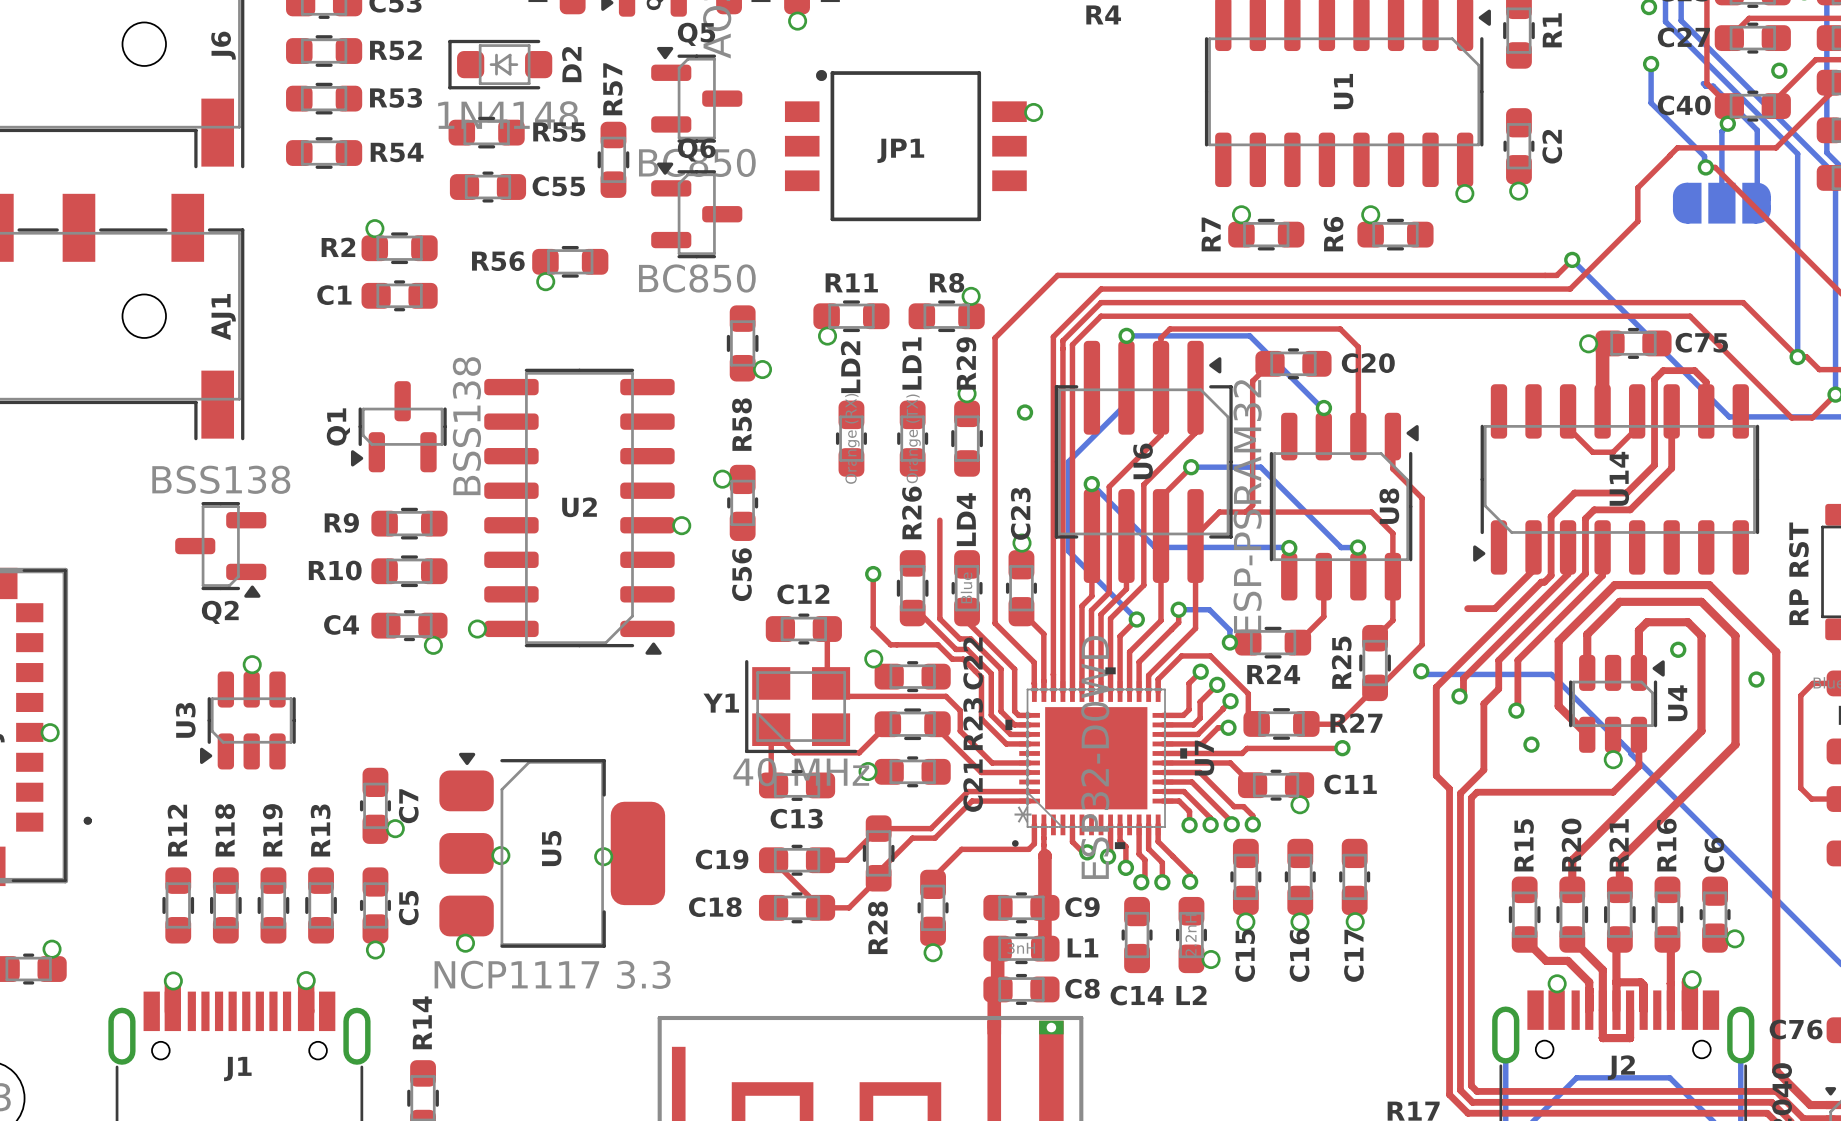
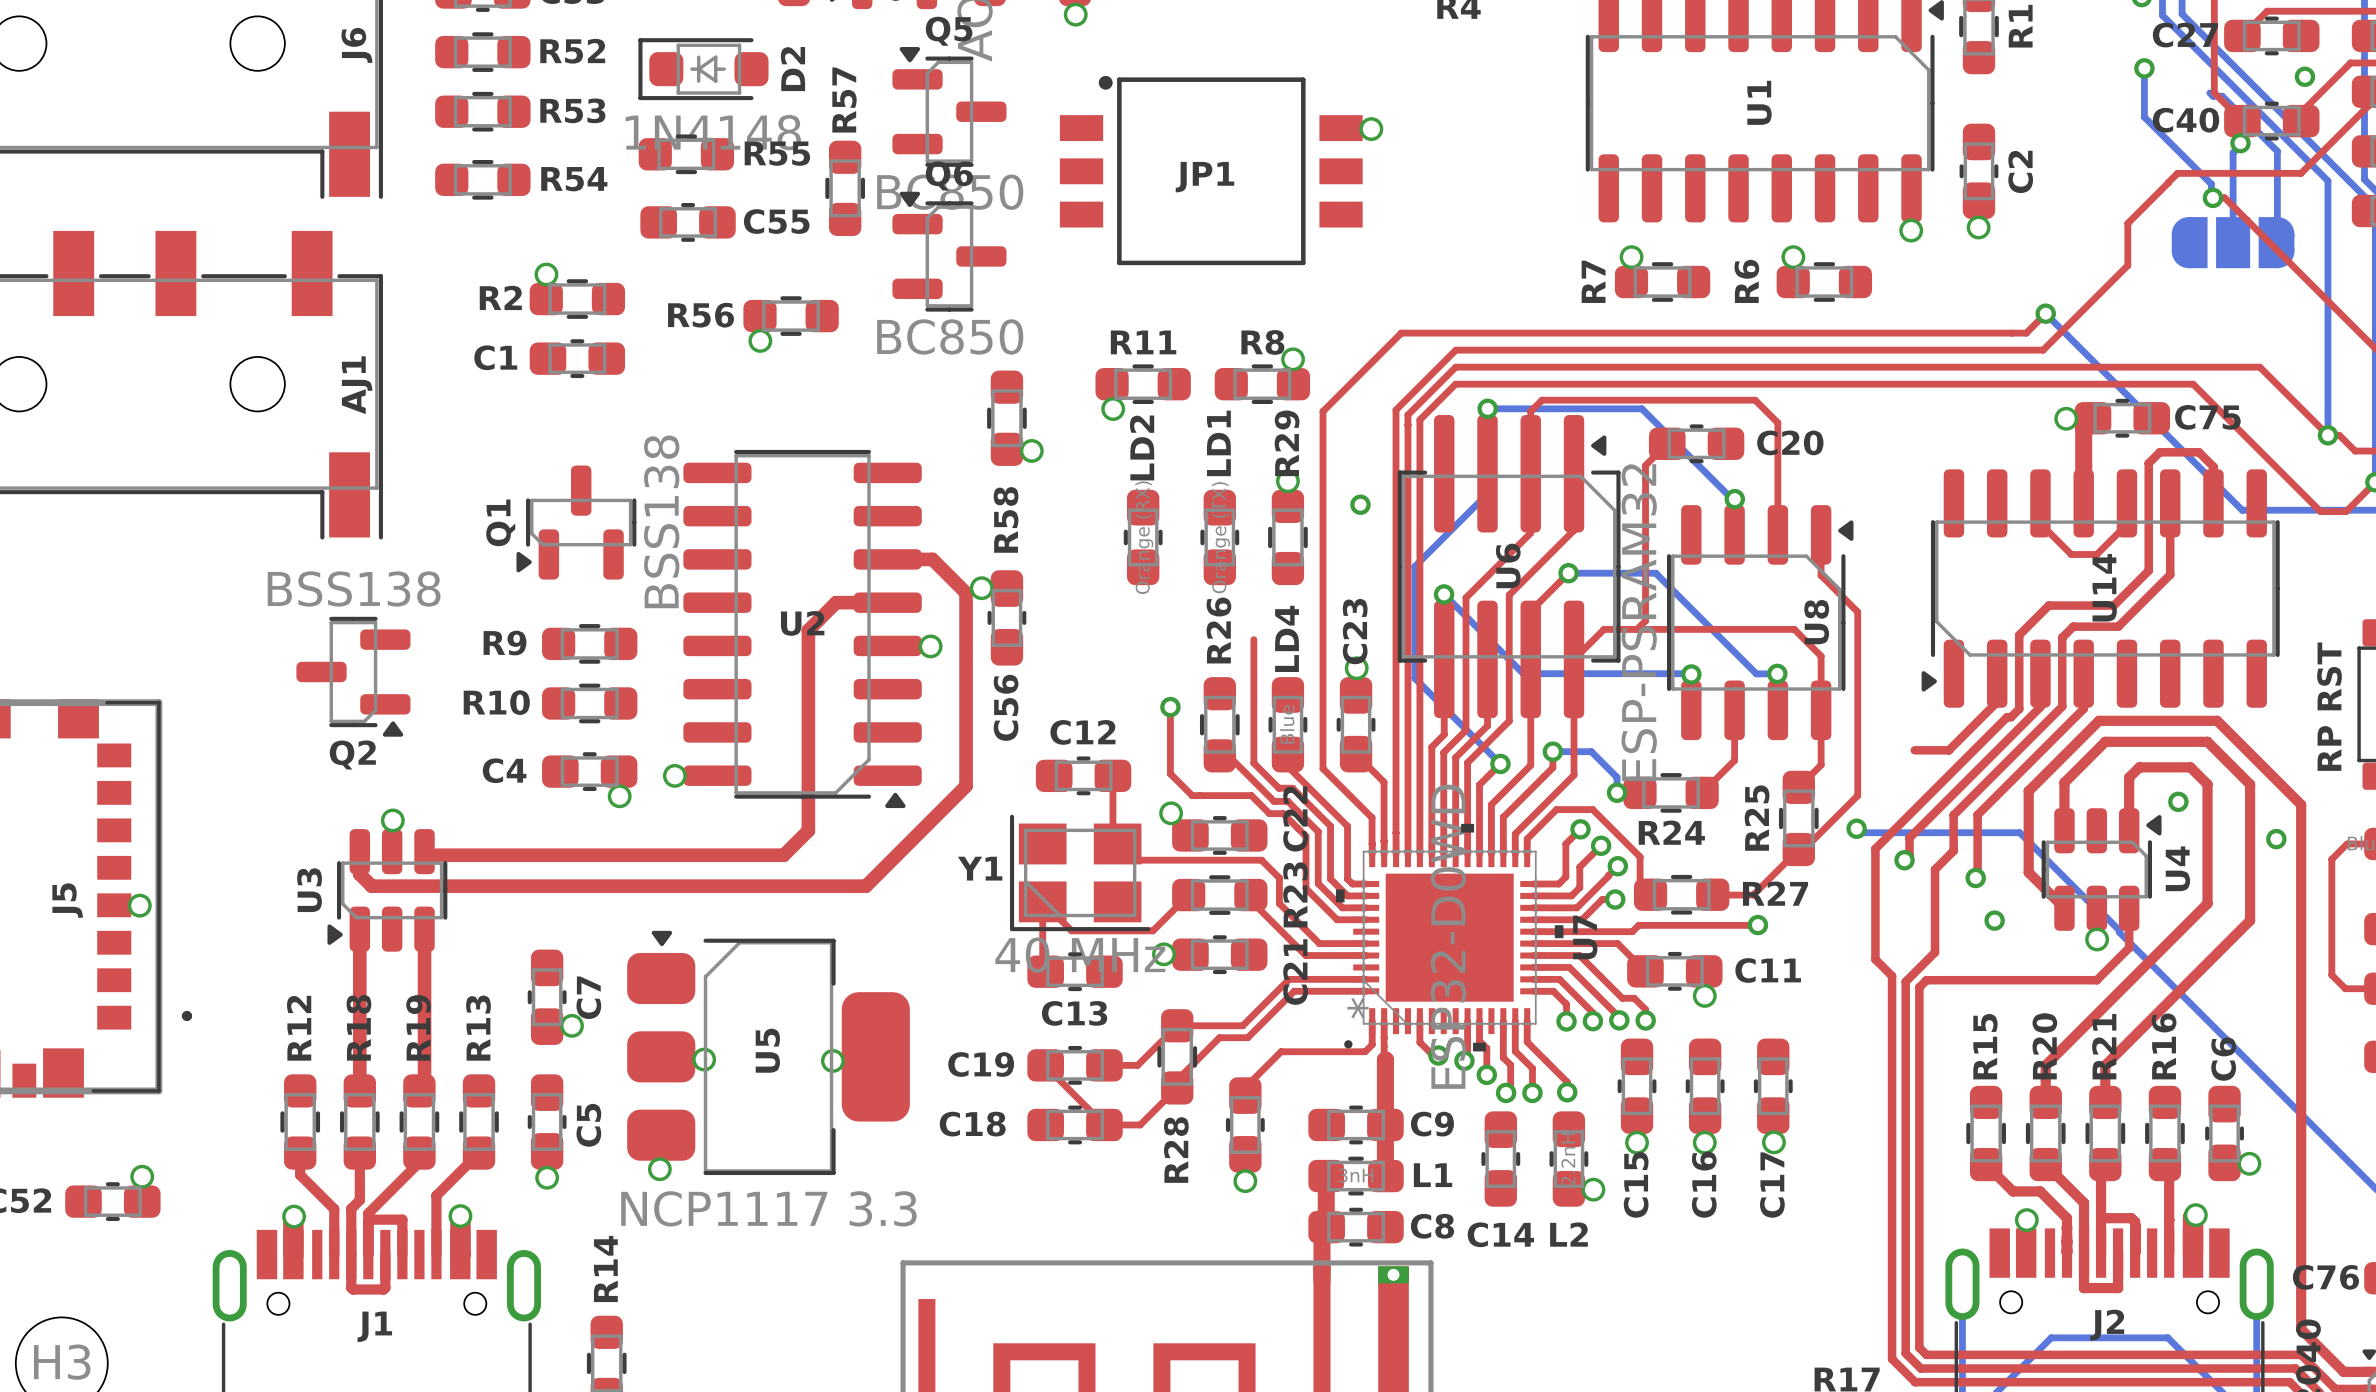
top track: none -> (887, 559) (932, 559) (966, 592) (966, 786) (865, 886) (371, 886) (359, 874) (359, 851)
top track: none -> (887, 602) (836, 602) (808, 630) (808, 830) (783, 855) (428, 855) (424, 851)
top track: none -> (359, 929) (359, 1090)
top track: none -> (424, 929) (424, 1085) (419, 1090)
top track: none -> (300, 1153) (300, 1175) (334, 1209) (334, 1254)
top track: none -> (359, 1153) (359, 1200) (351, 1208) (351, 1287) (352, 1289) (383, 1289) (385, 1287) (385, 1254)
top track: none -> (419, 1153) (419, 1162) (368, 1213) (368, 1254)
top track: none -> (479, 1153) (436, 1195) (436, 1254)
top track: none -> (368, 1221) (369, 1219) (402, 1219) (402, 1254)

